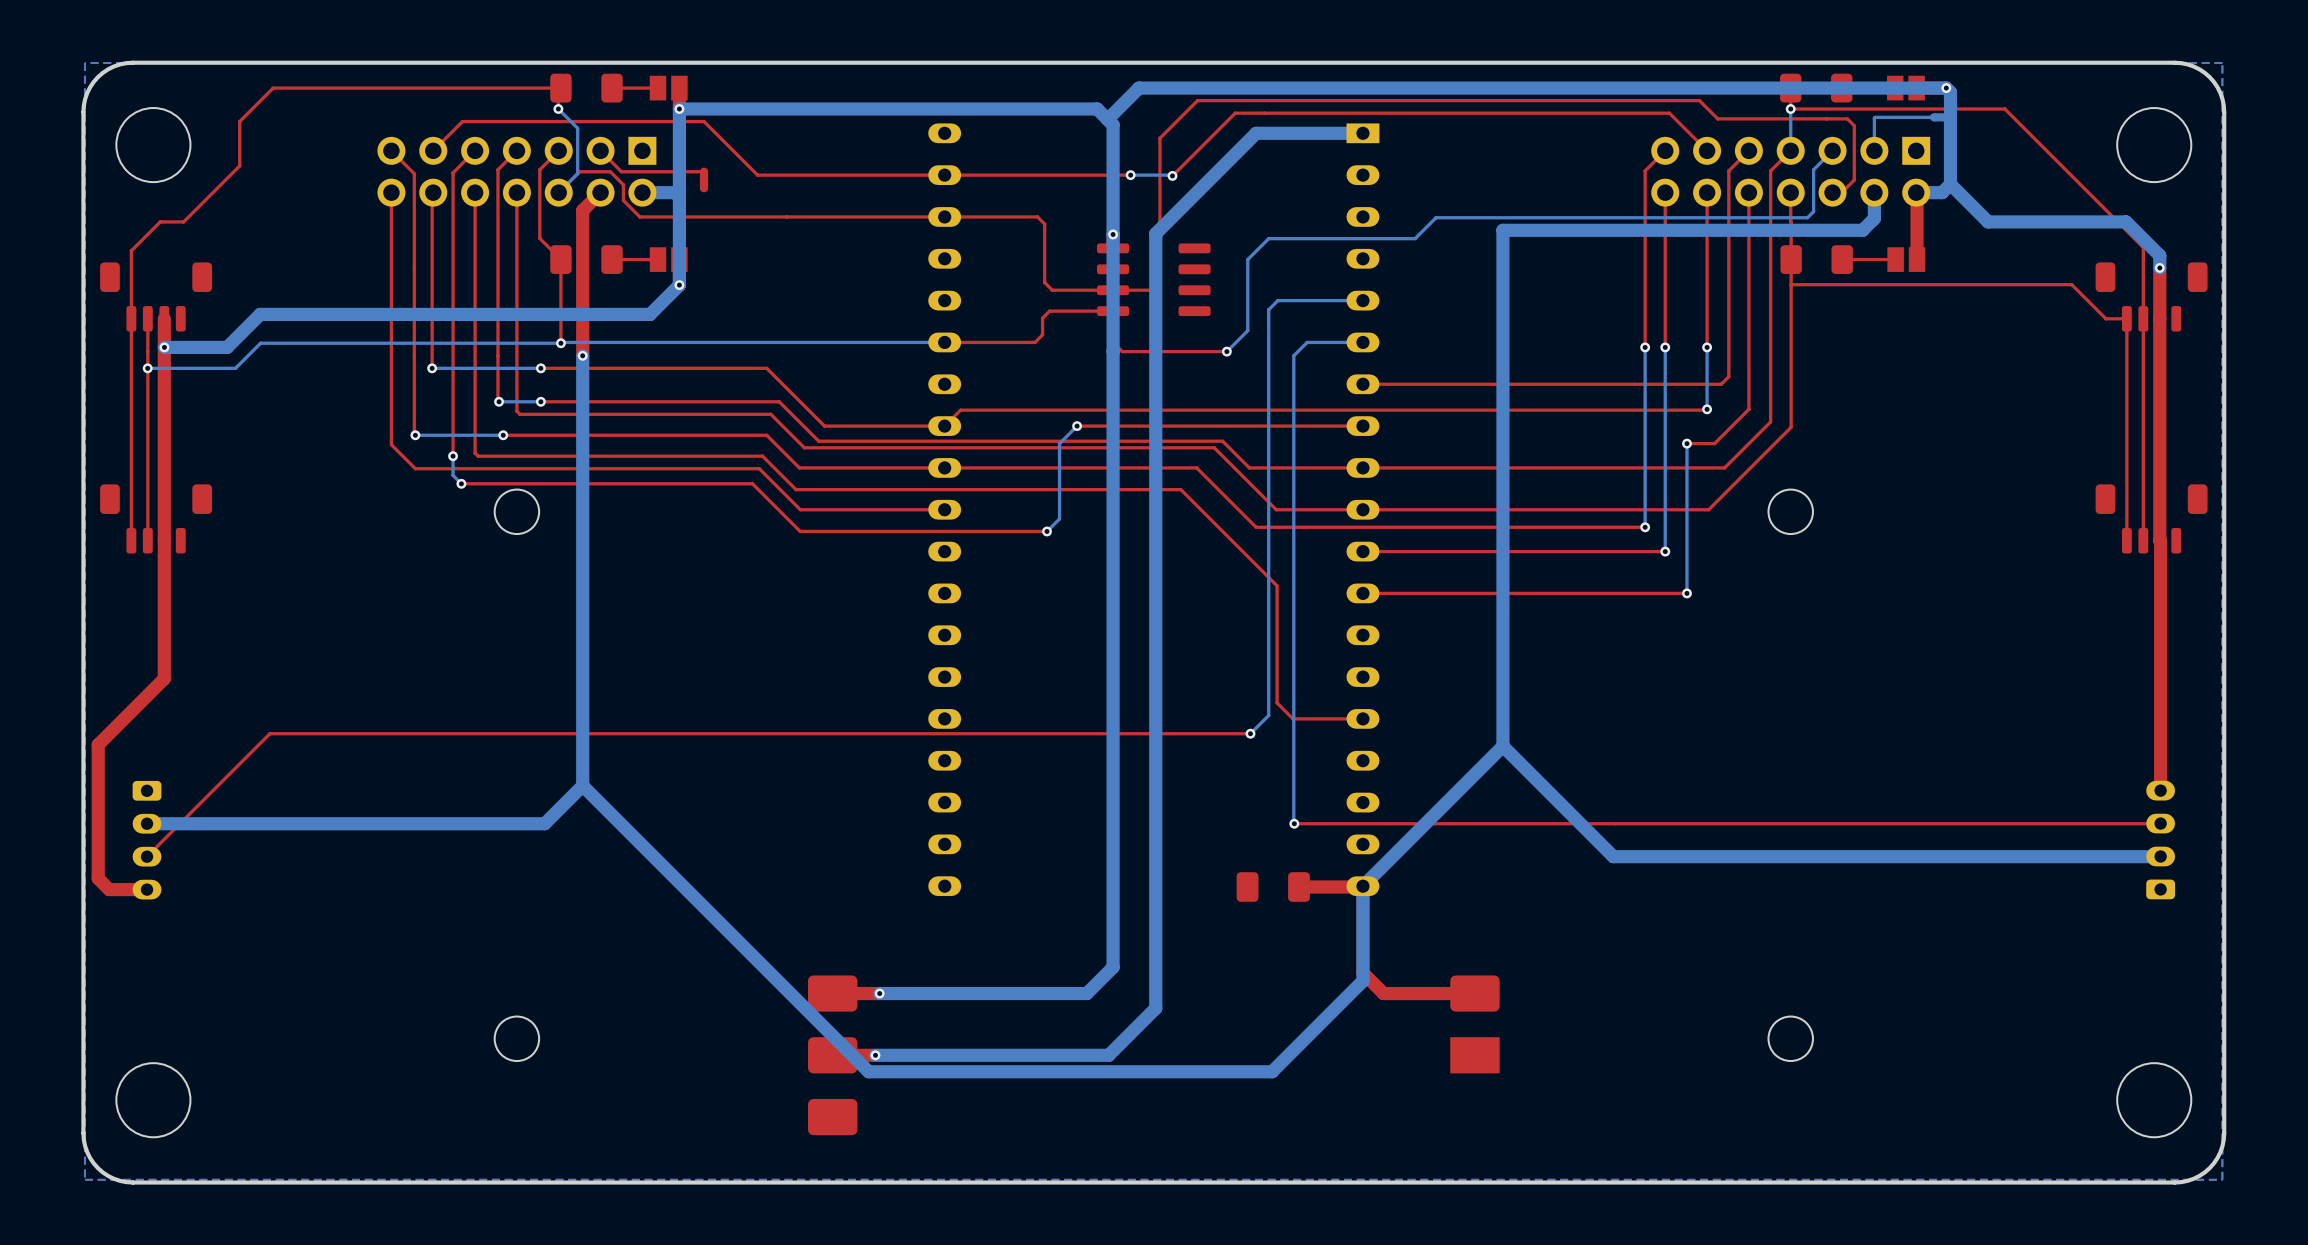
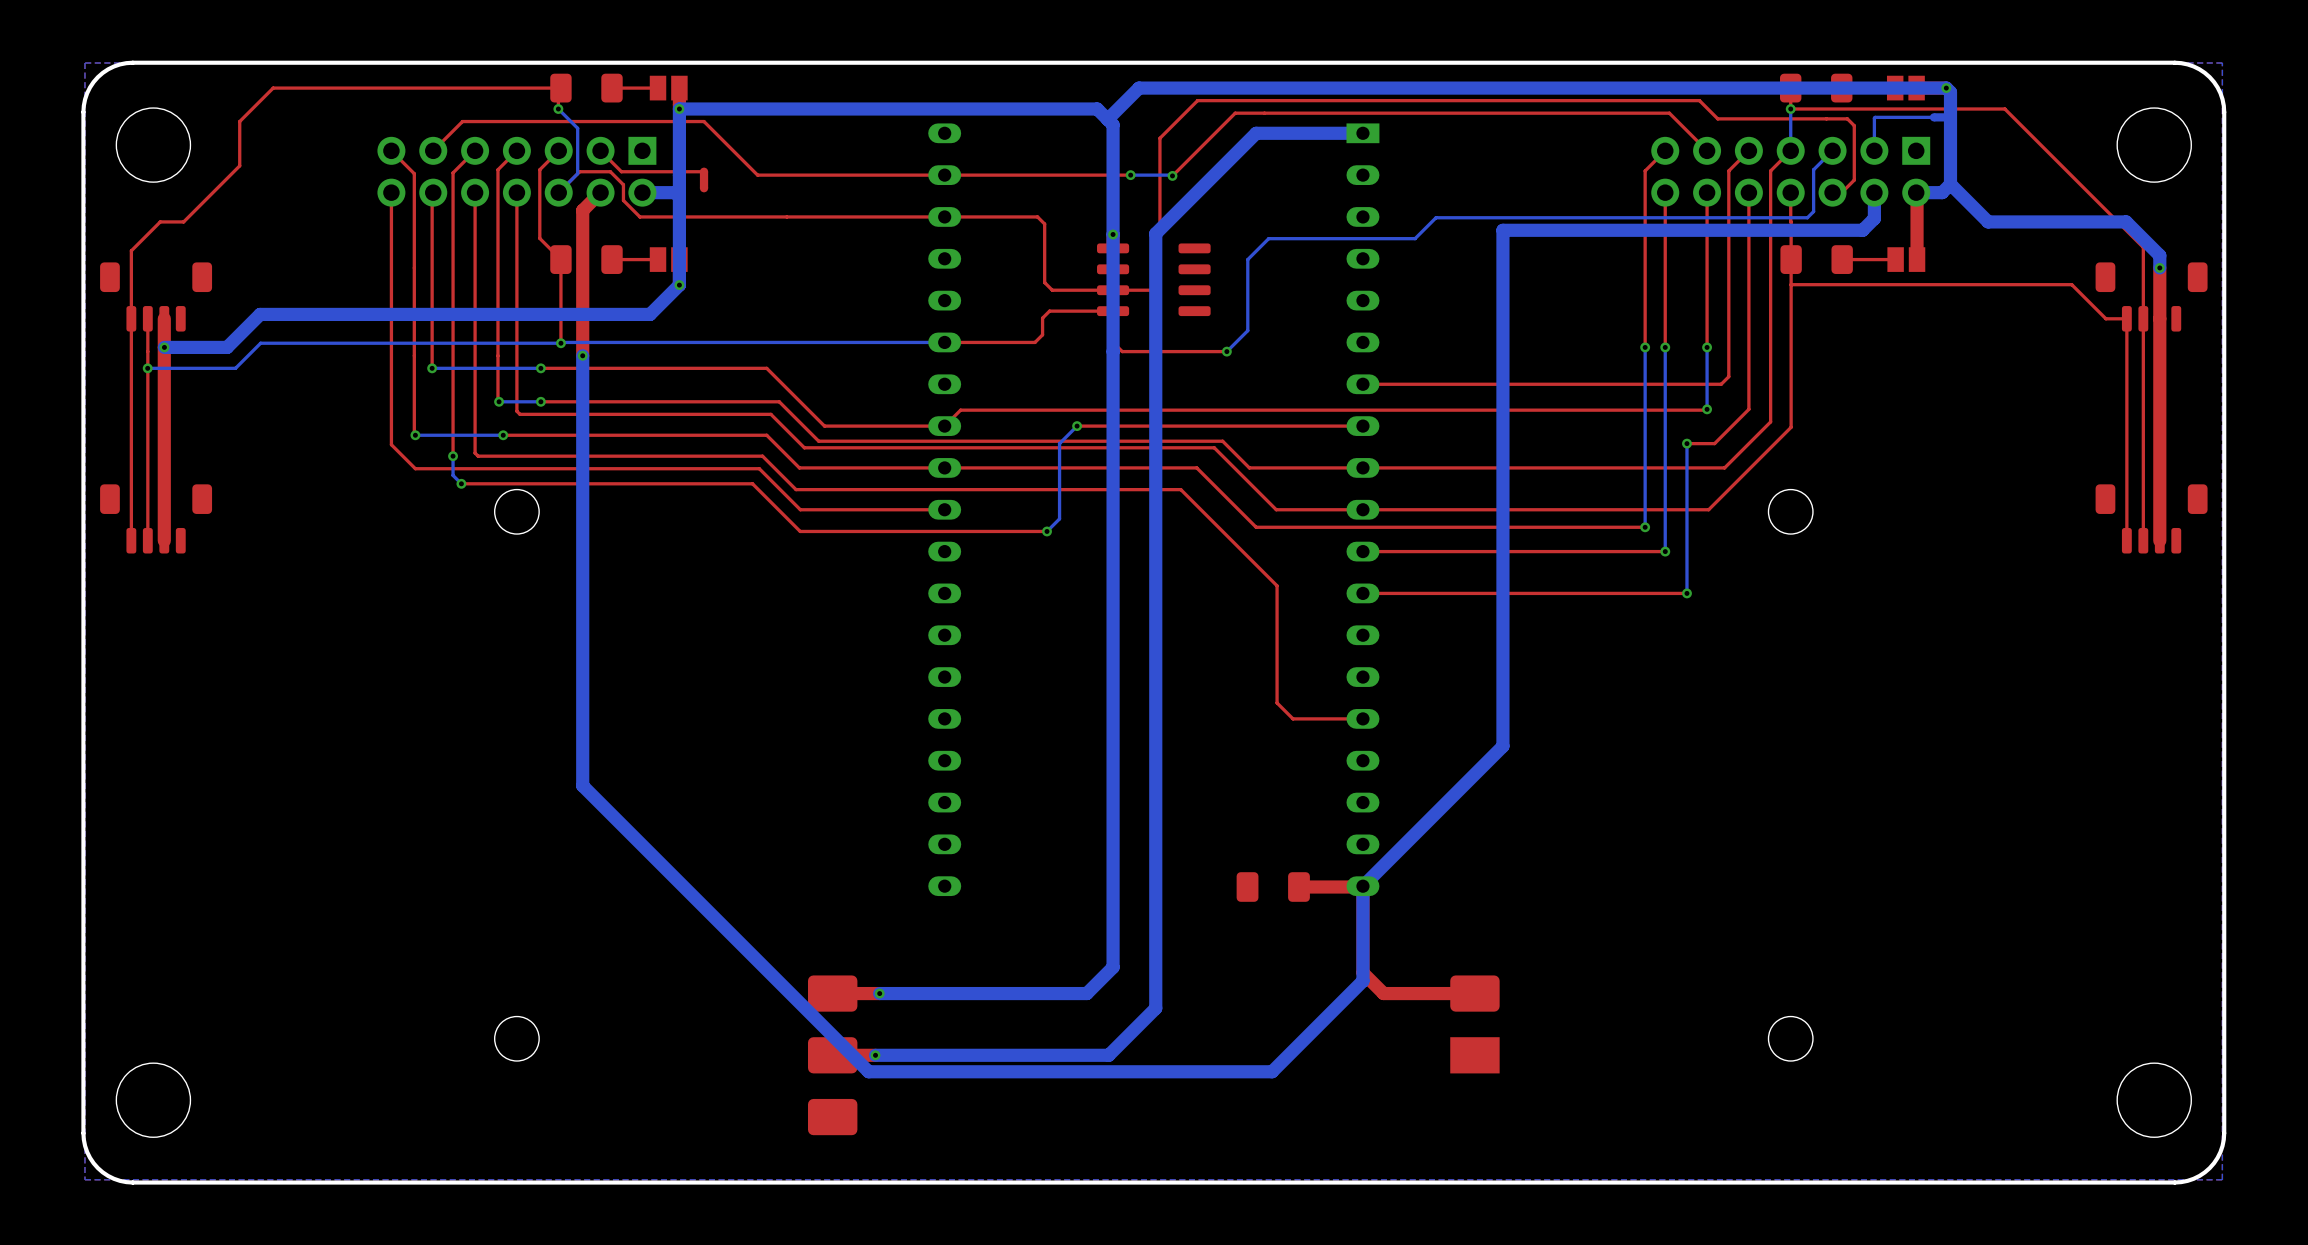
bottom track: (1362, 300) (1277, 300) (1268, 309) (1268, 715) (1250, 733) -> none
bottom track: (1362, 342) (1307, 342) (1293, 355) (1294, 823) -> none
top track: (164, 540) (164, 678) (98, 744) (98, 878) (109, 889) (147, 889) -> none
top track: (2159, 540) (2160, 790) -> none
top track: (1250, 733) (269, 733) (147, 856) -> none
via: (1250, 733) -> none
bottom track: (1502, 746) (1613, 856) (2160, 856) -> none
bottom track: (582, 785) (544, 823) (147, 823) -> none
via: (1294, 823) -> none
top track: (2160, 823) (1294, 823) -> none
part: (147, 840) -> none
part: (2160, 840) -> none

